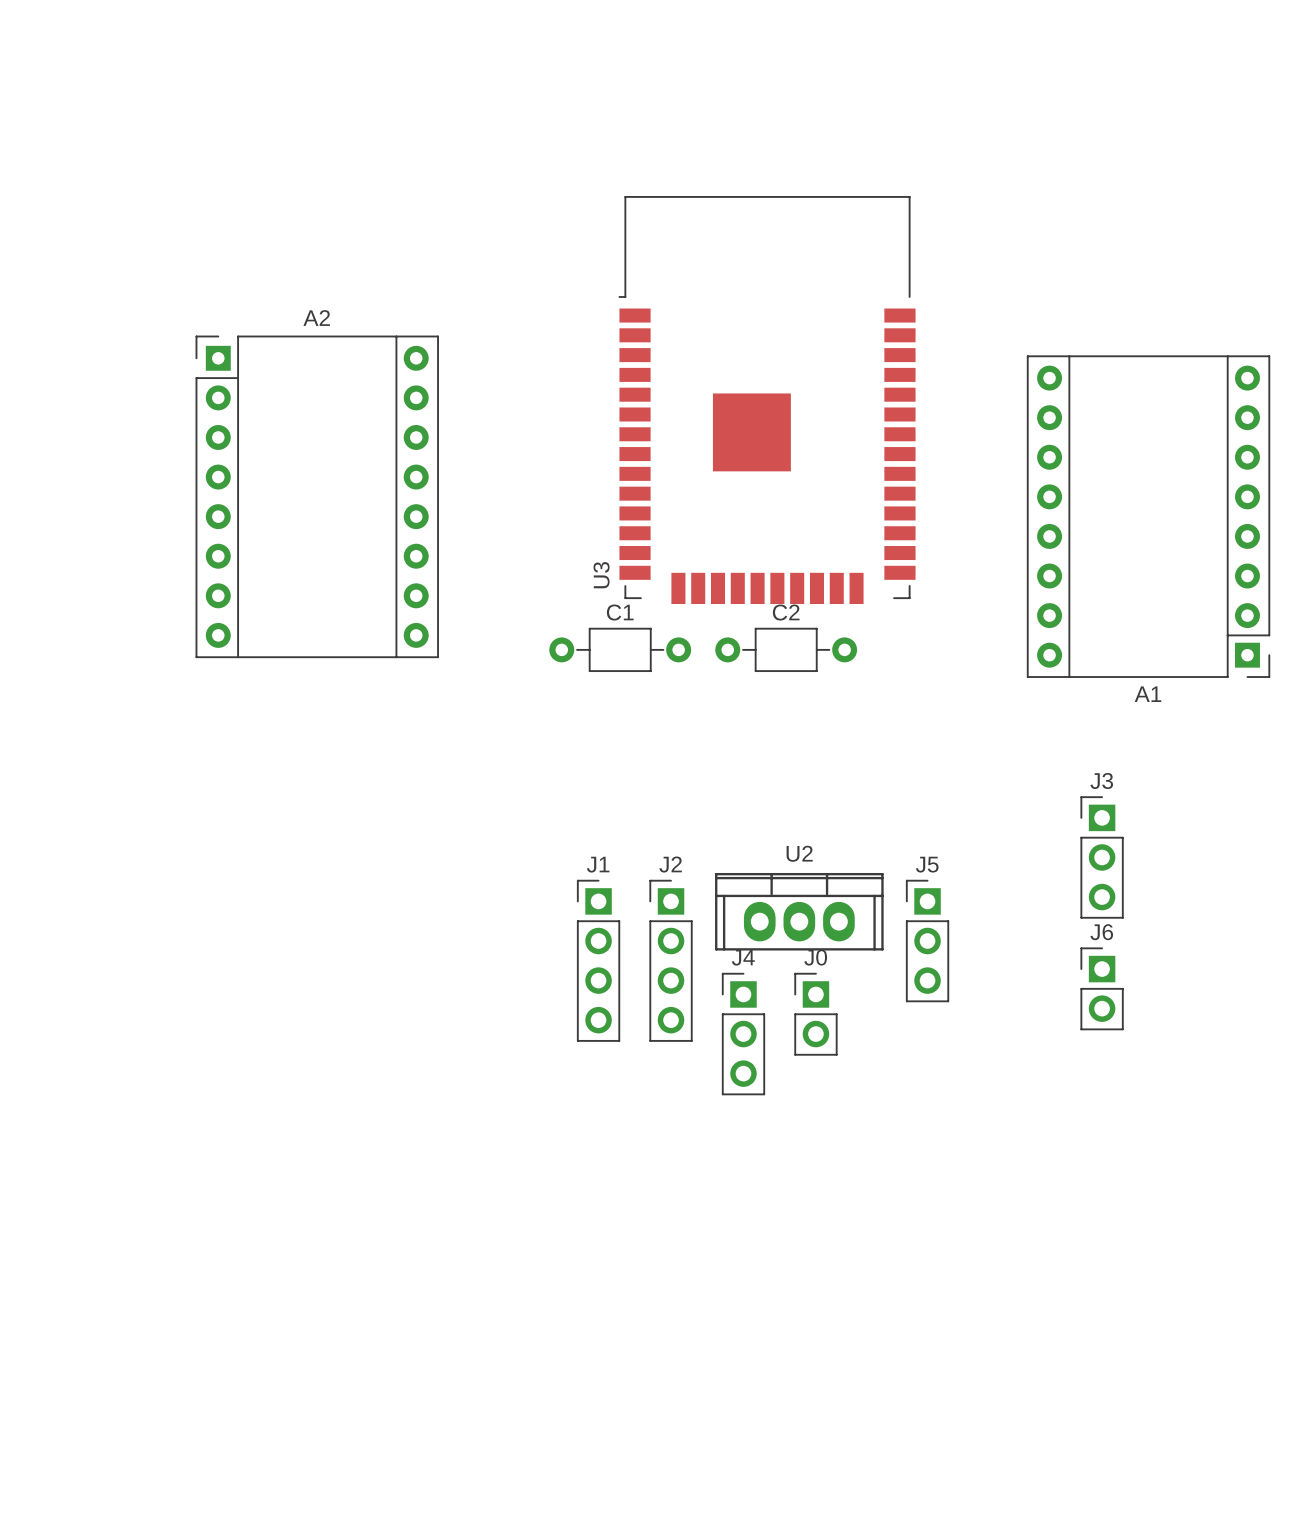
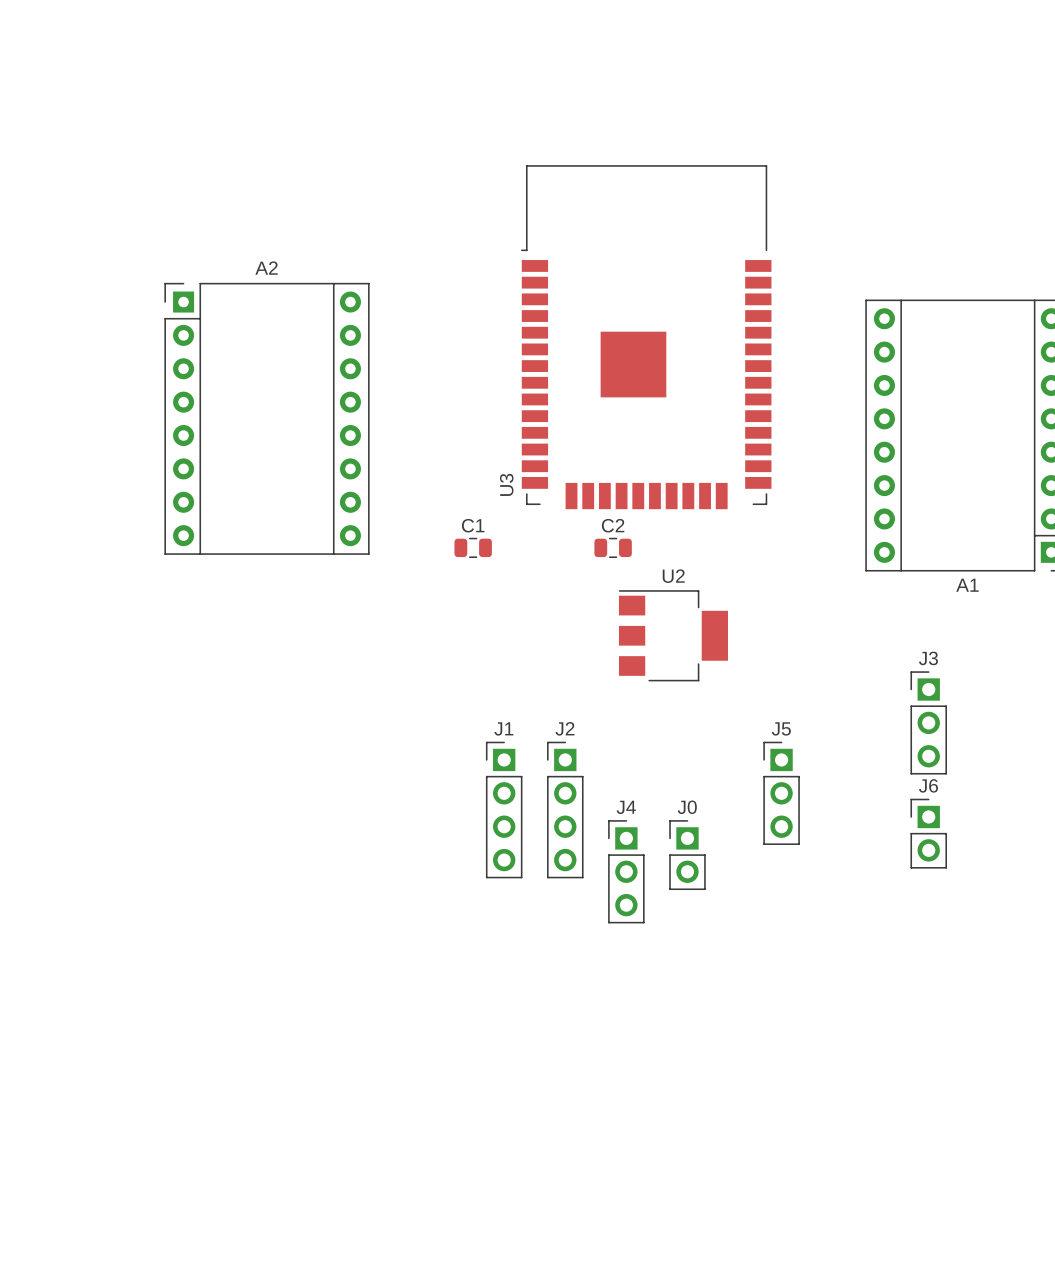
C1 footprint: [549, 627, 692, 673] -> [454, 537, 492, 558]
C2 footprint: [715, 627, 858, 673] -> [594, 537, 632, 558]
U2 footprint: [715, 872, 884, 951] -> [618, 590, 729, 682]

